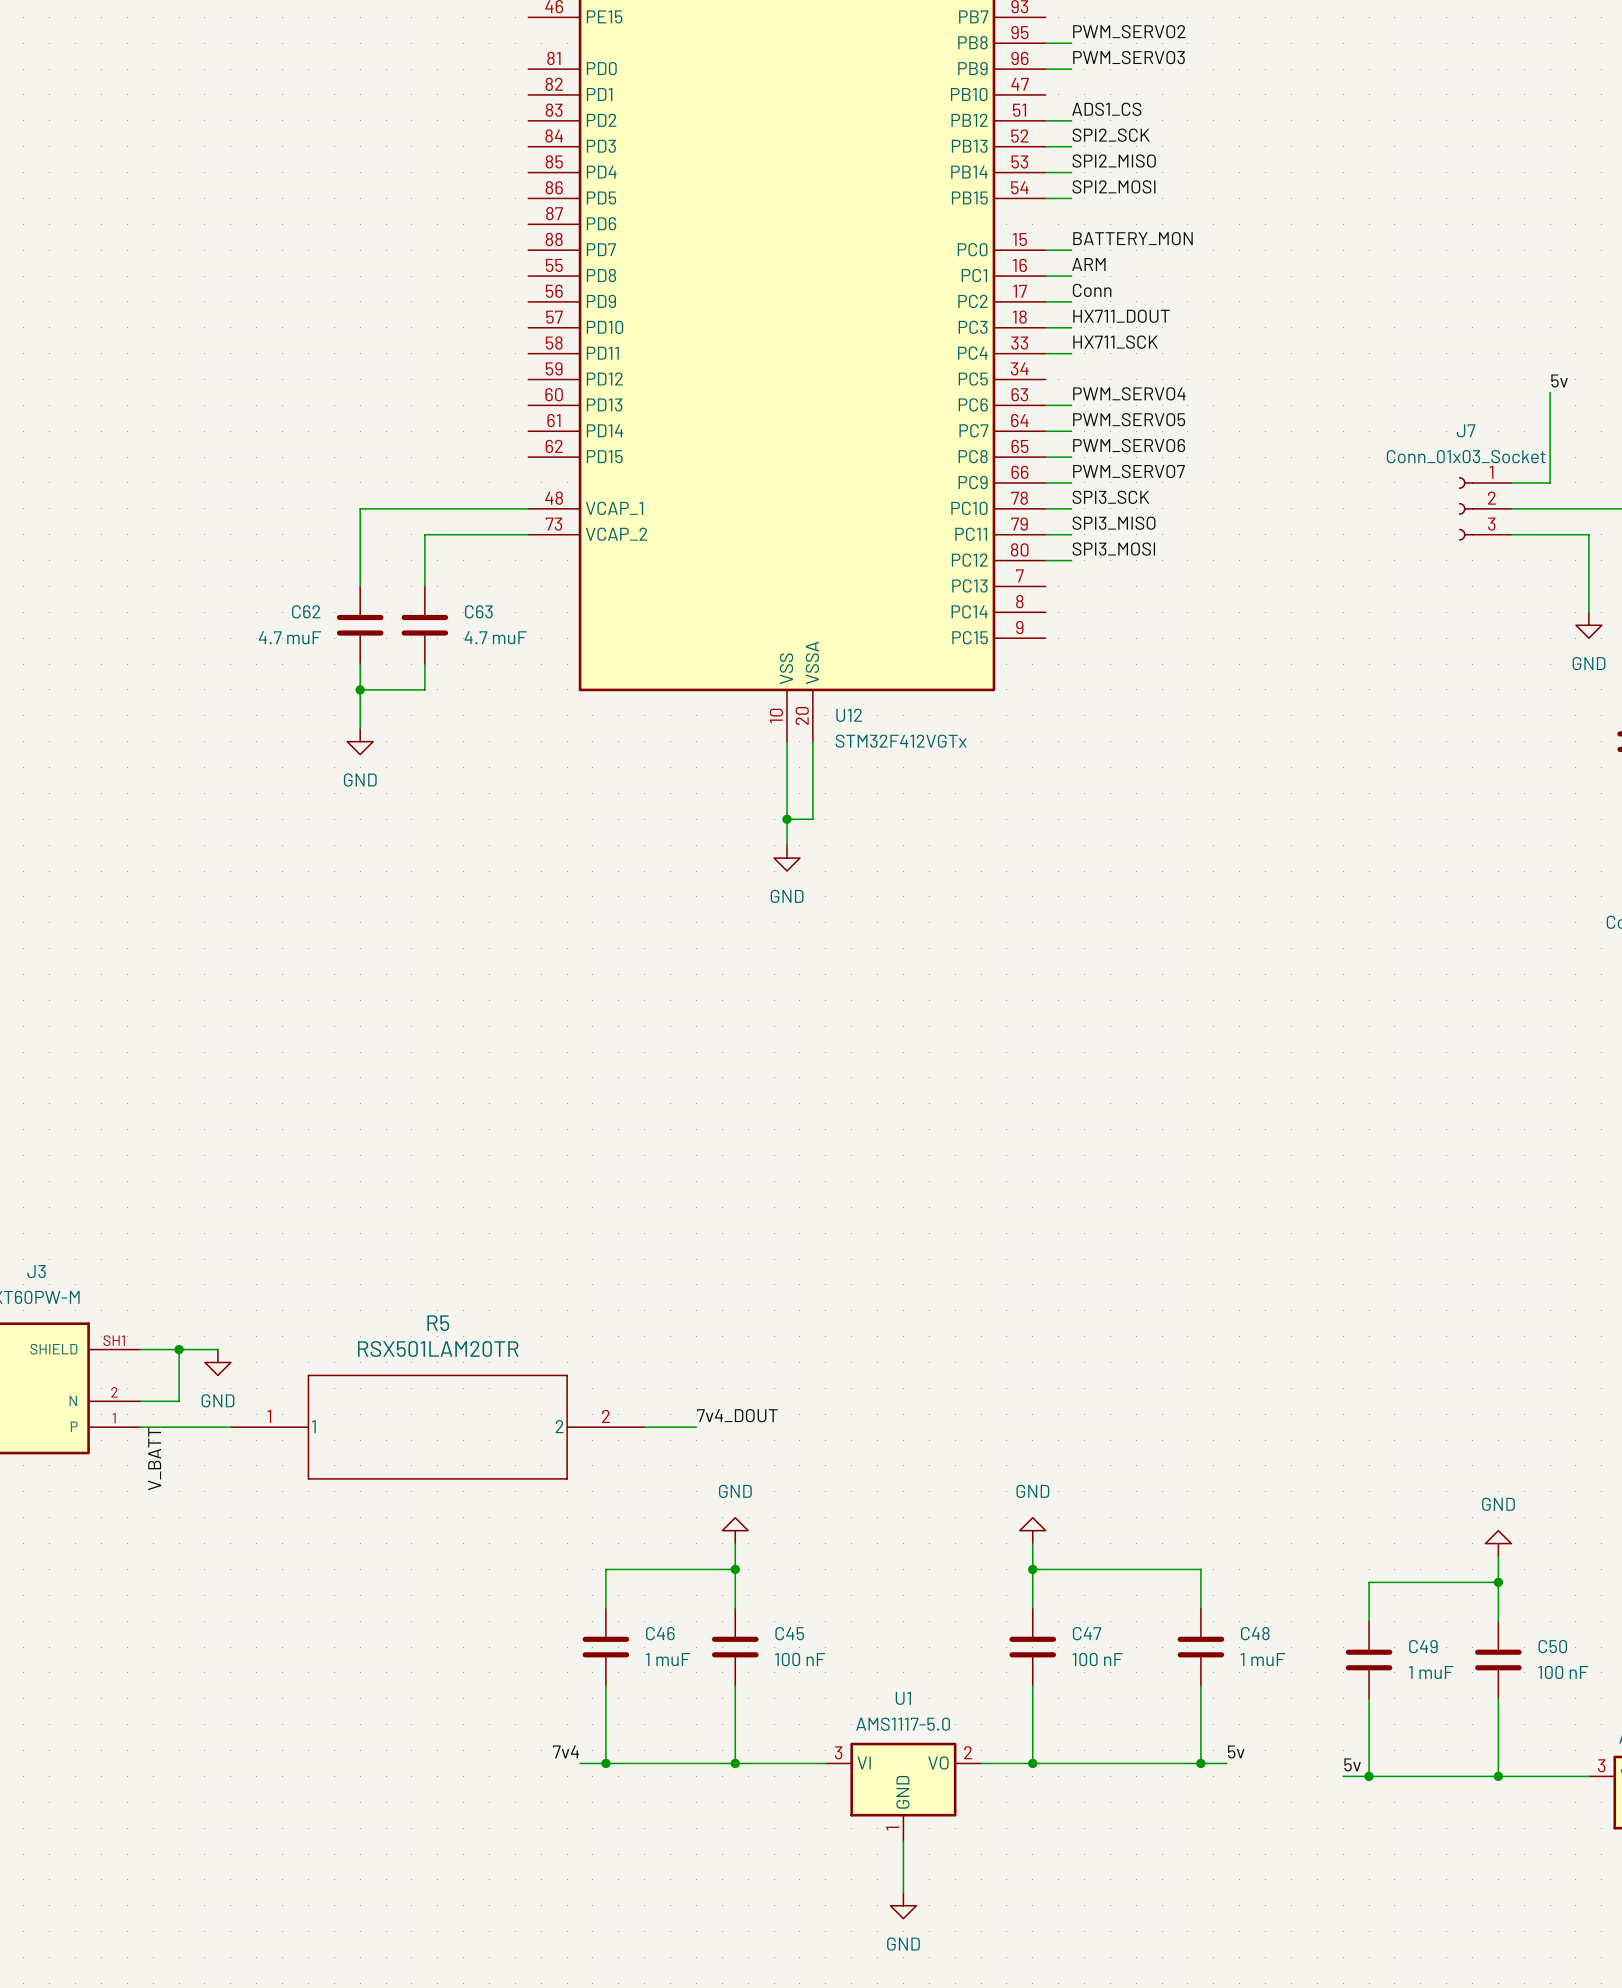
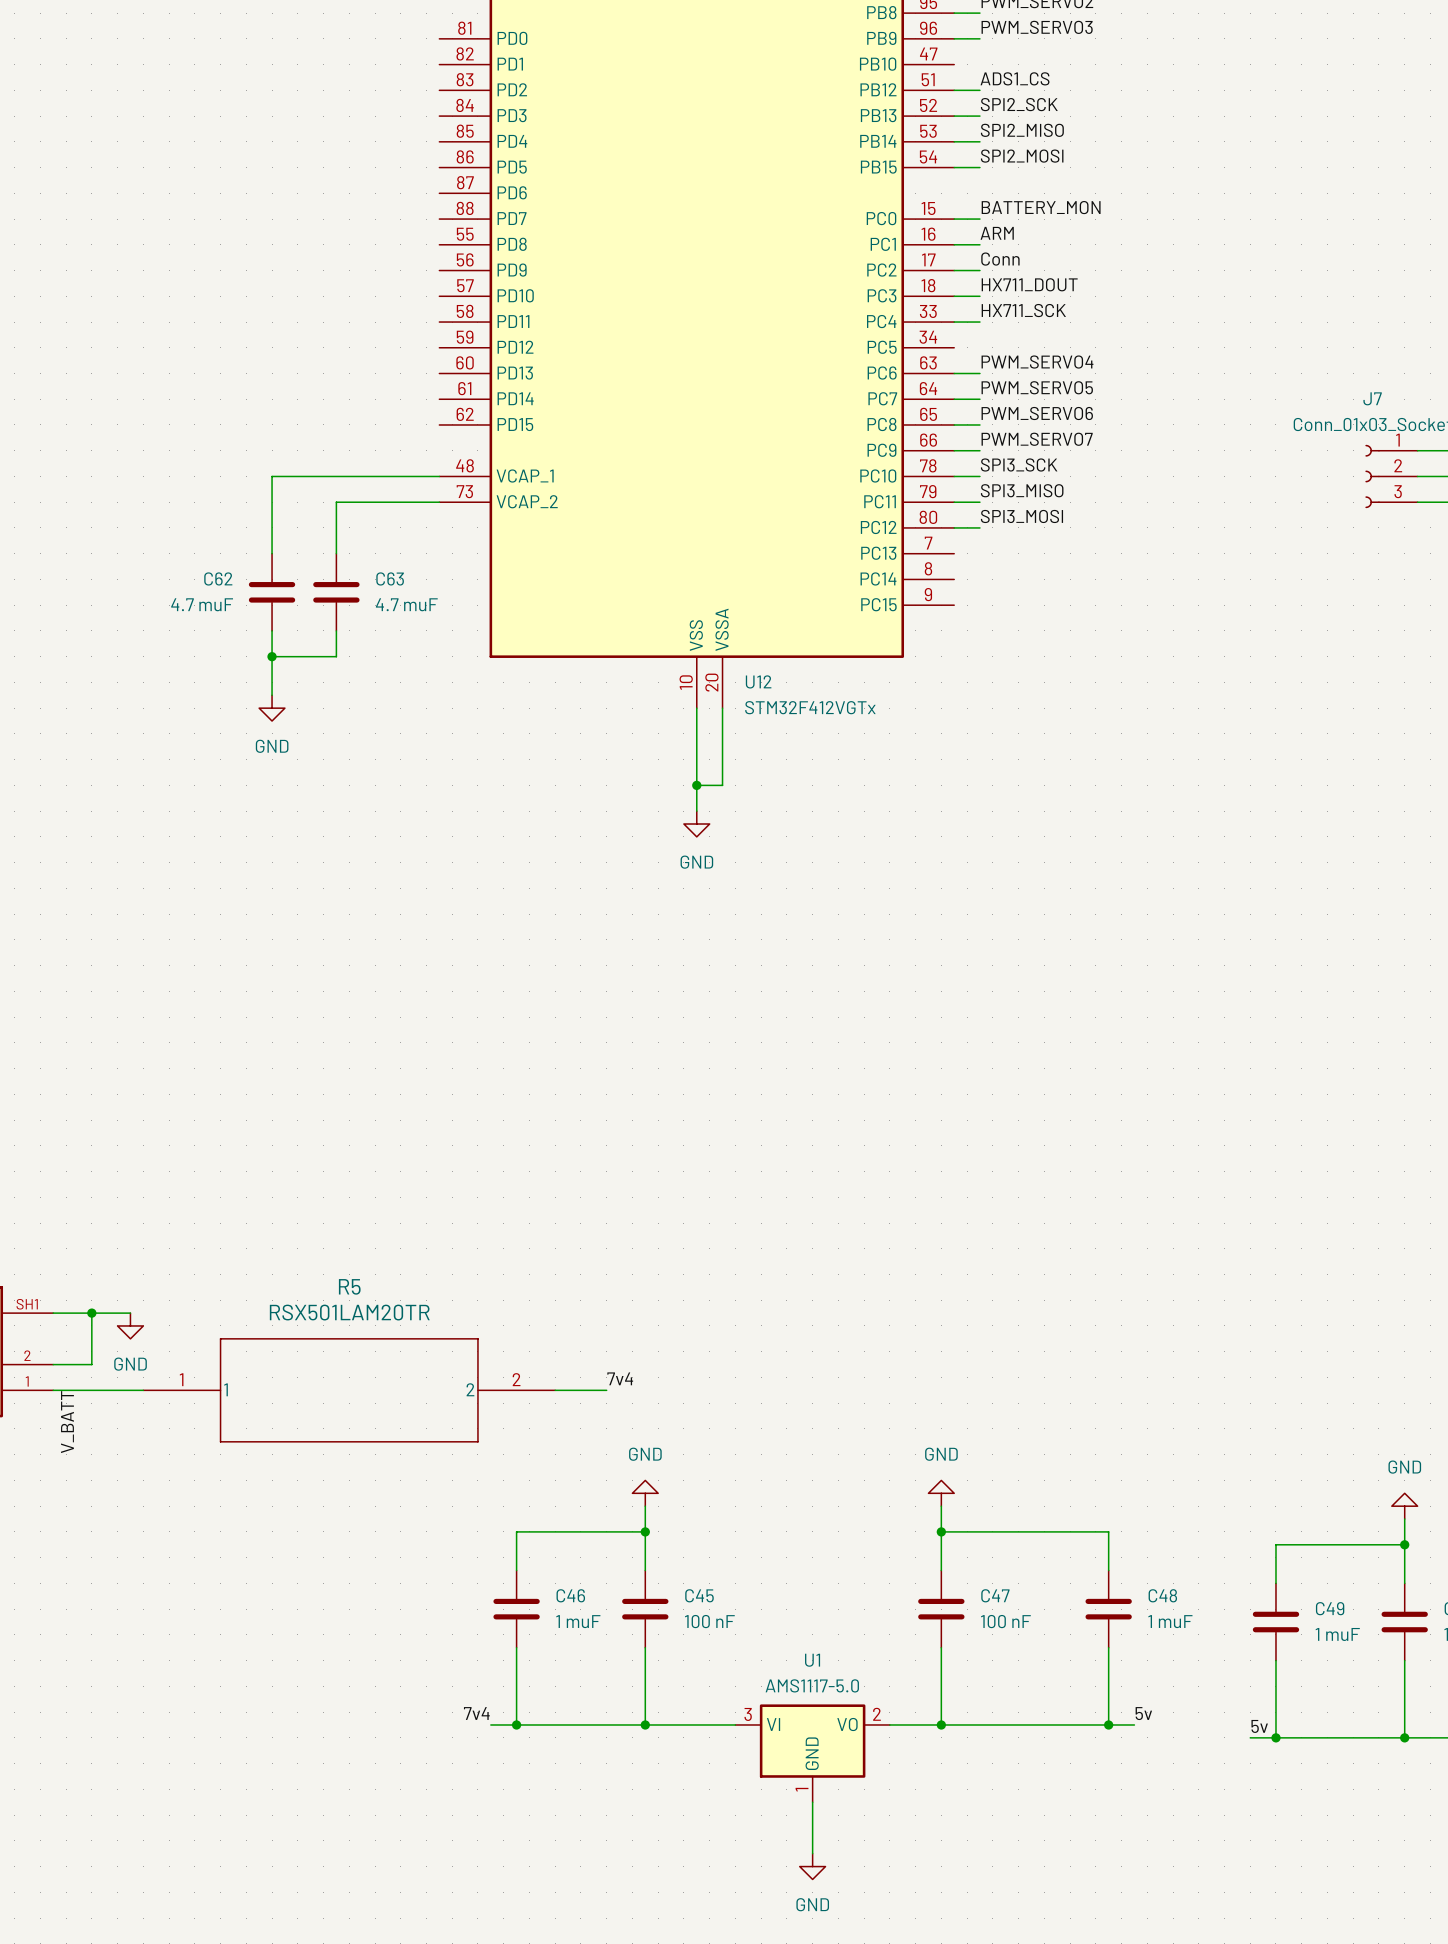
label: 7v4_DOUT (737, 1415) -> 7v4 (620, 1378)

